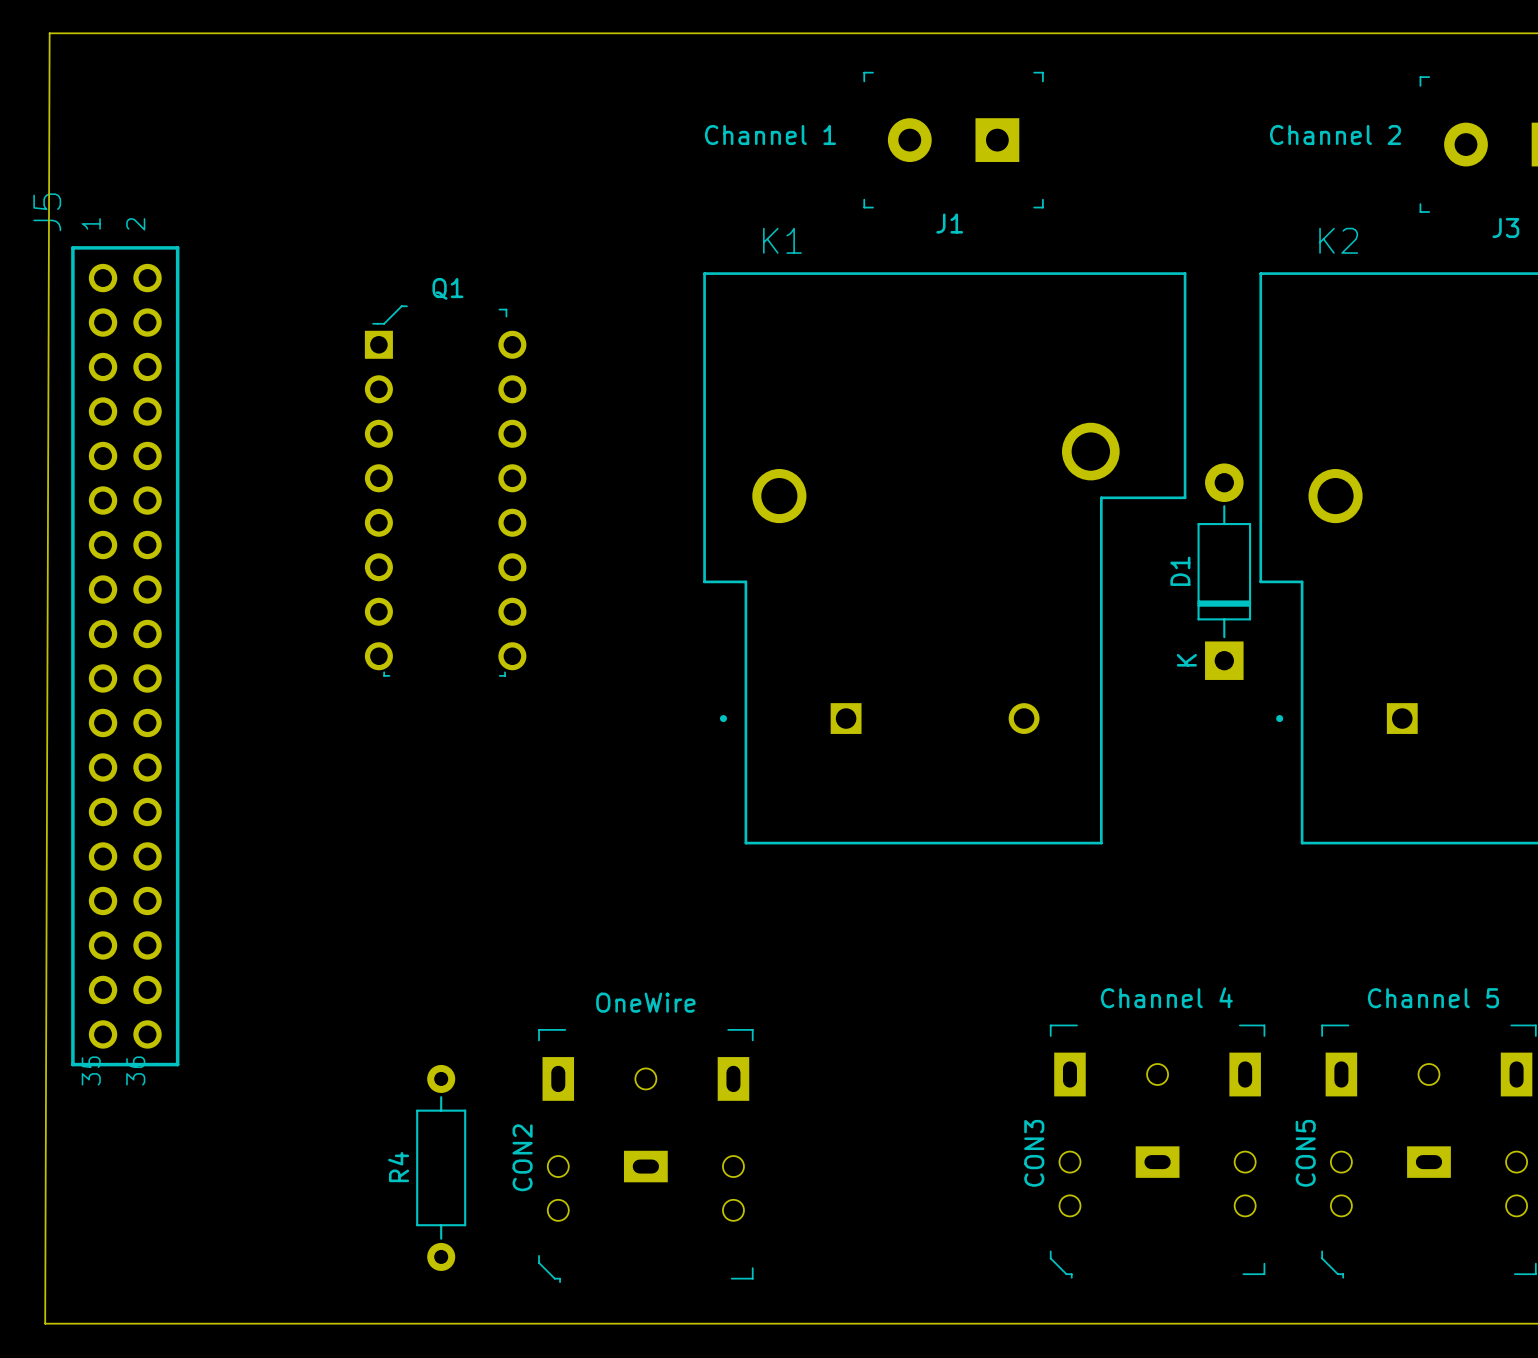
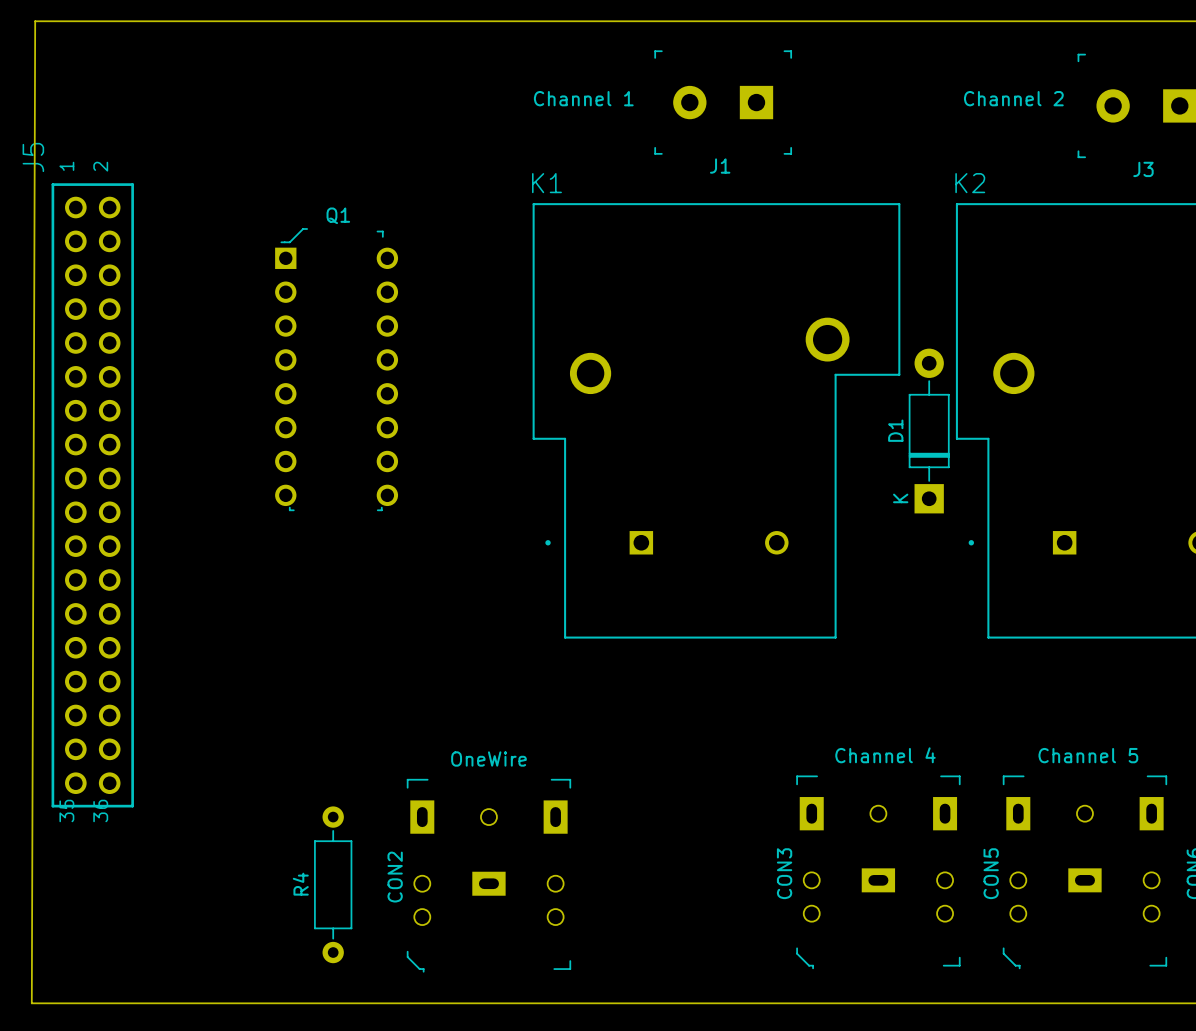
K1 name position: K1 (782, 240) -> K1 (546, 183)
K2 name position: K2 (1338, 240) -> K2 (970, 183)

